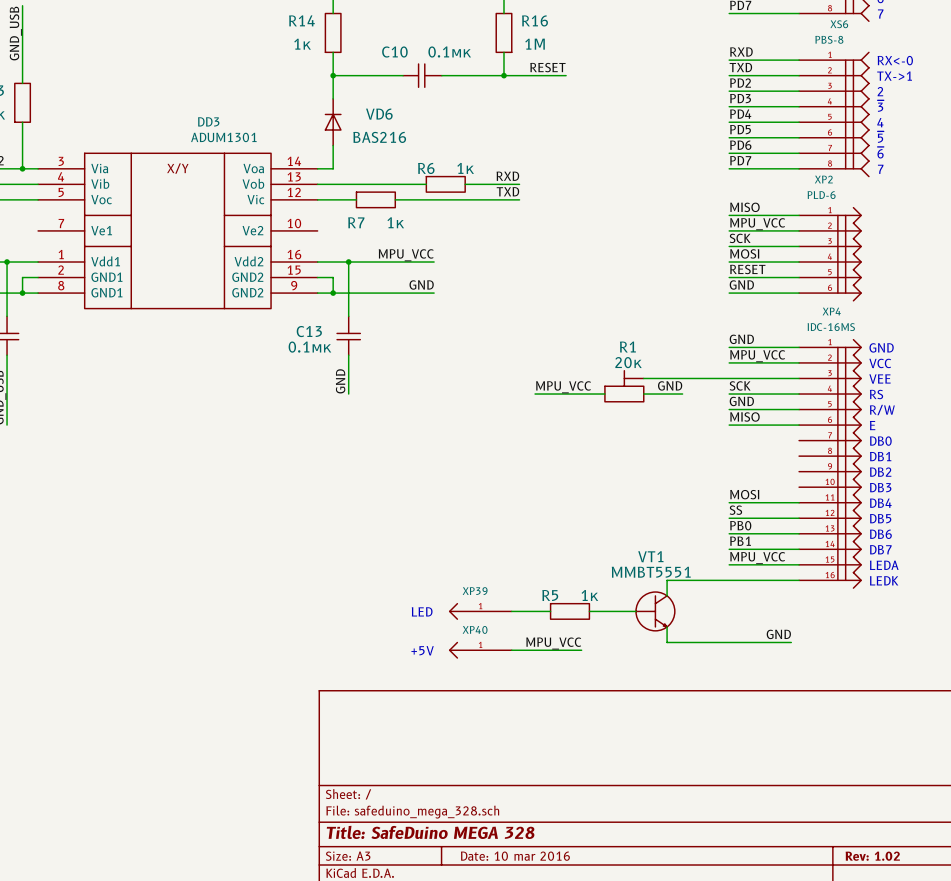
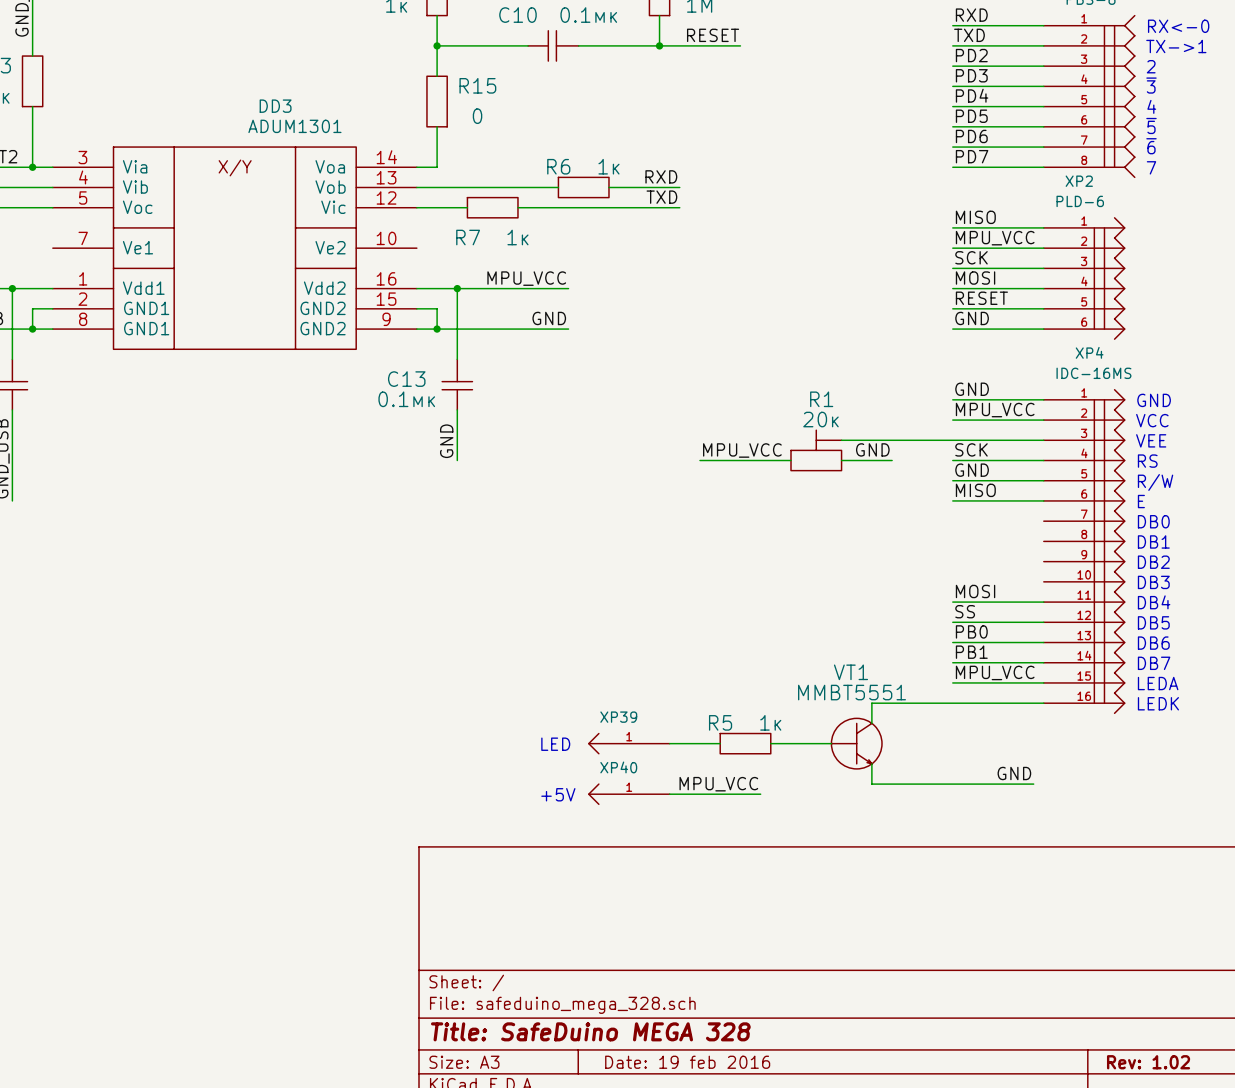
R15: none -> 0 (437, 101)
VD6: BAS216 (333, 122) -> none
title block: Date: 10 mar 2016 (515, 856) -> Date: 19 feb 2016 (687, 1062)

